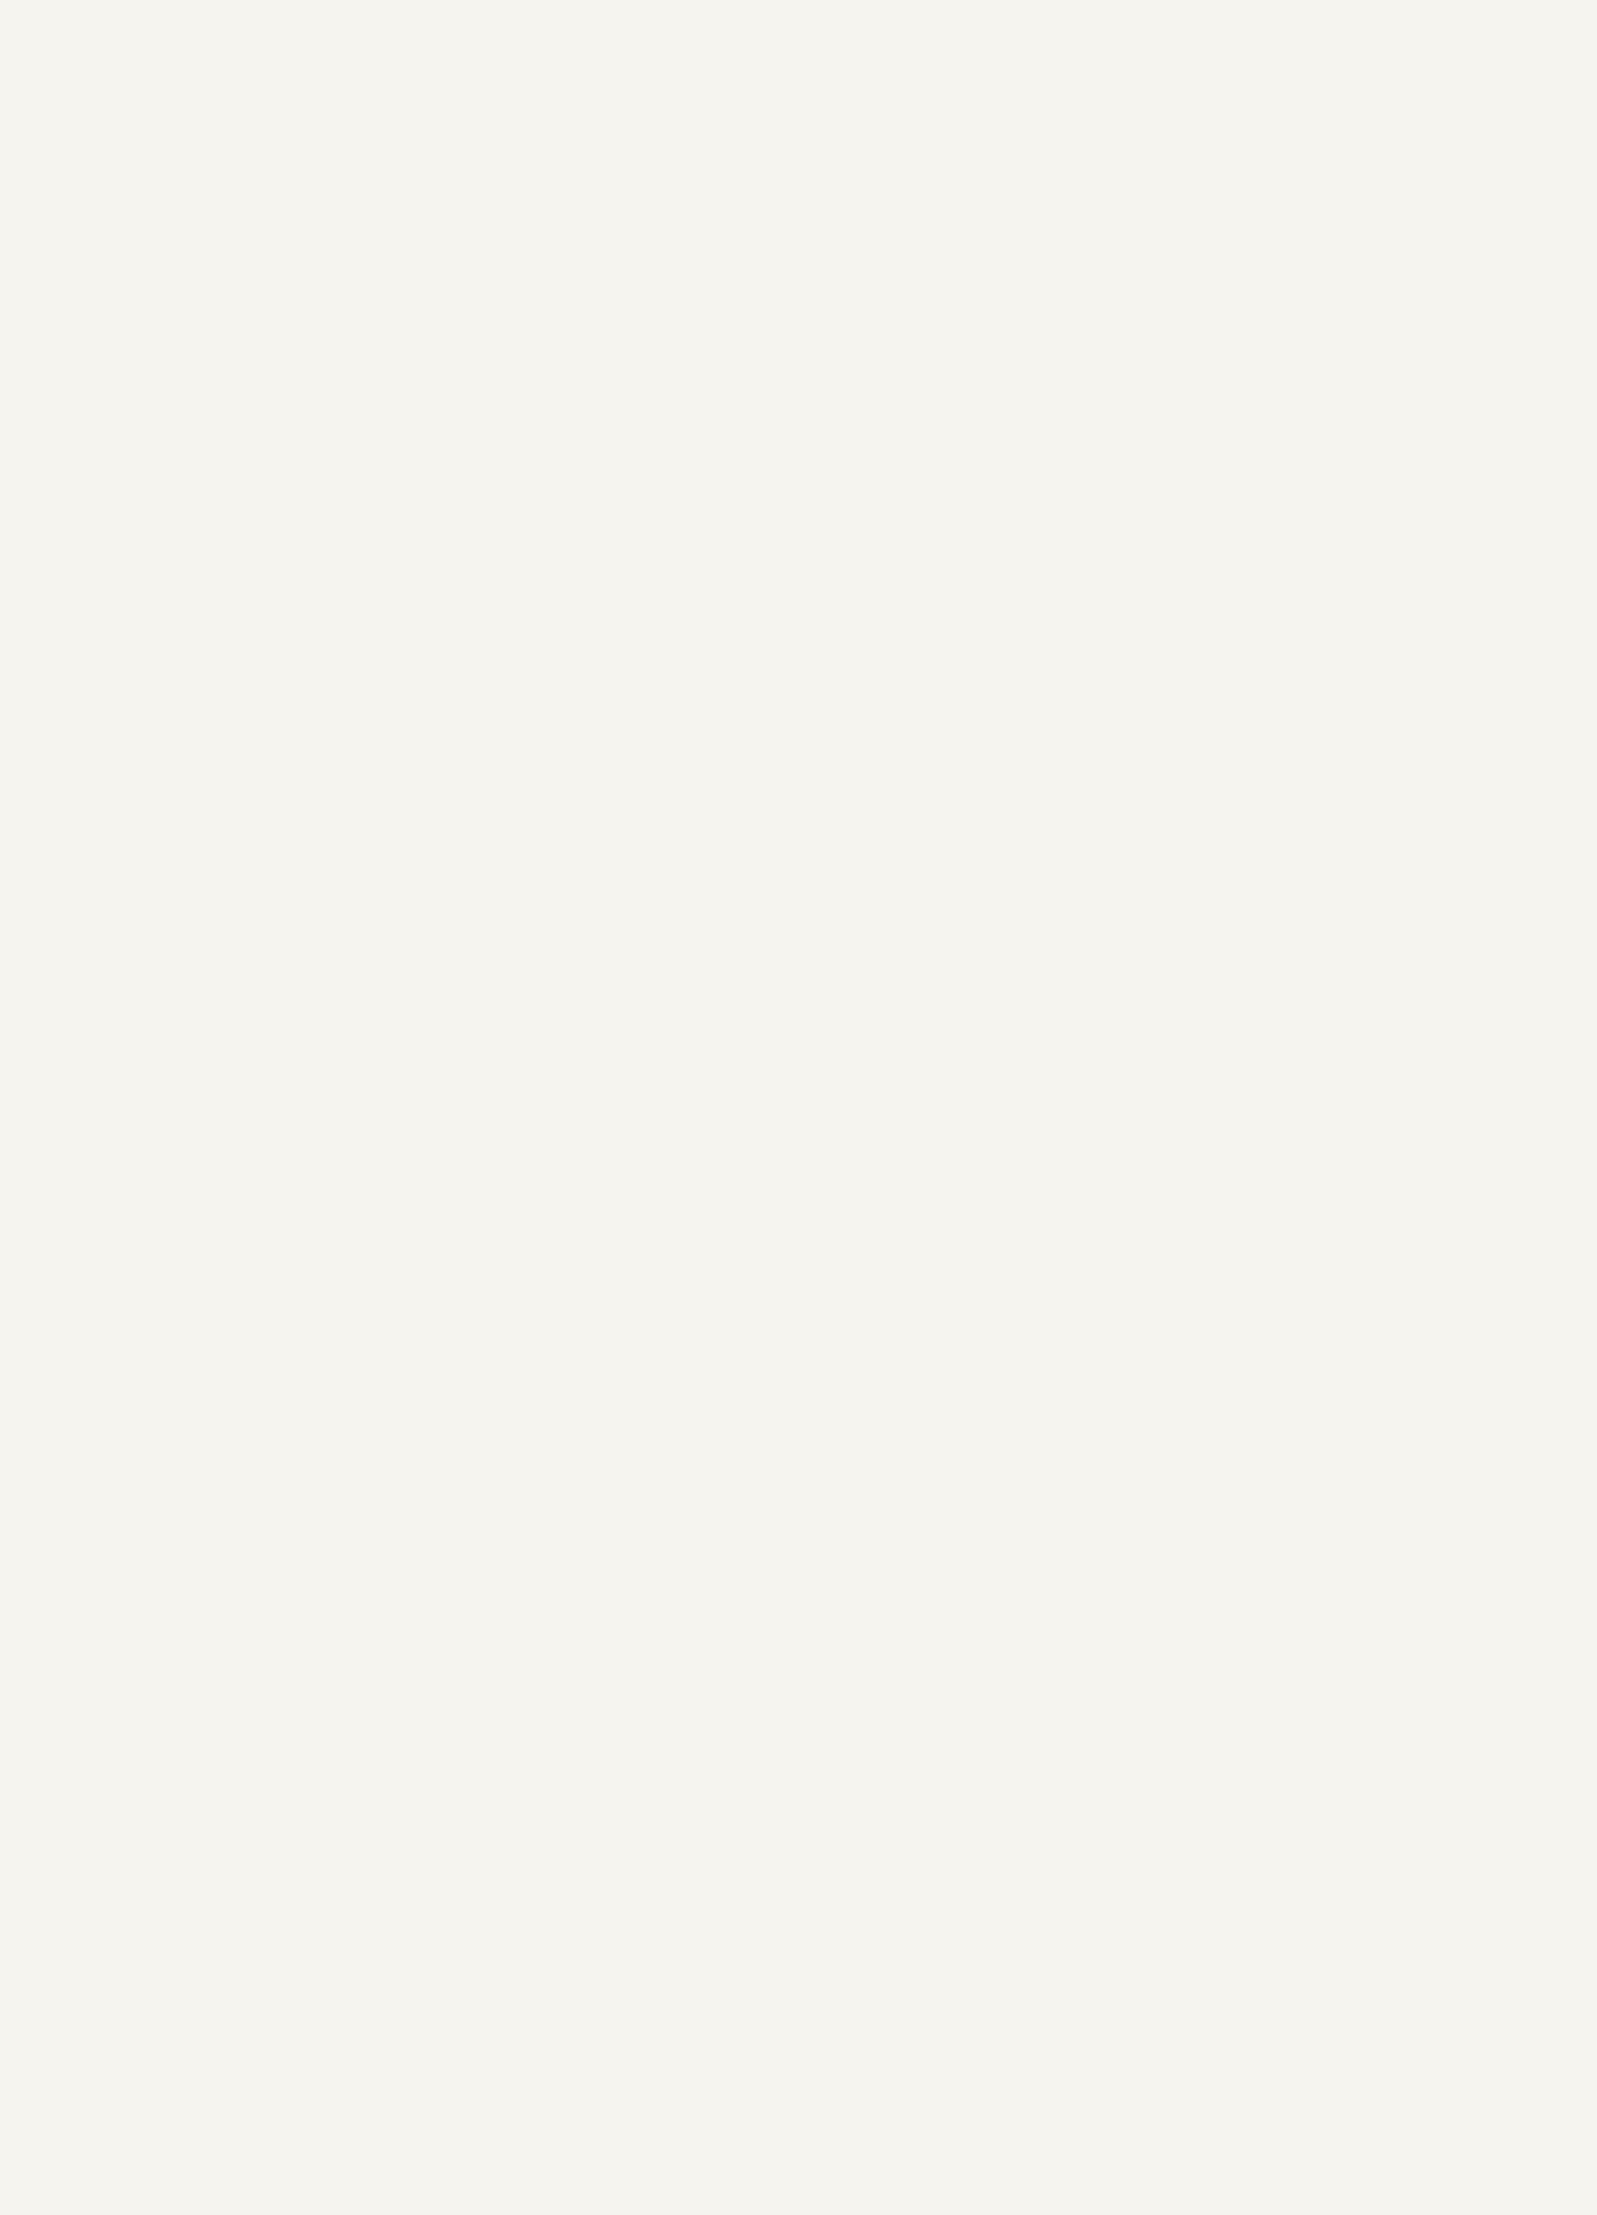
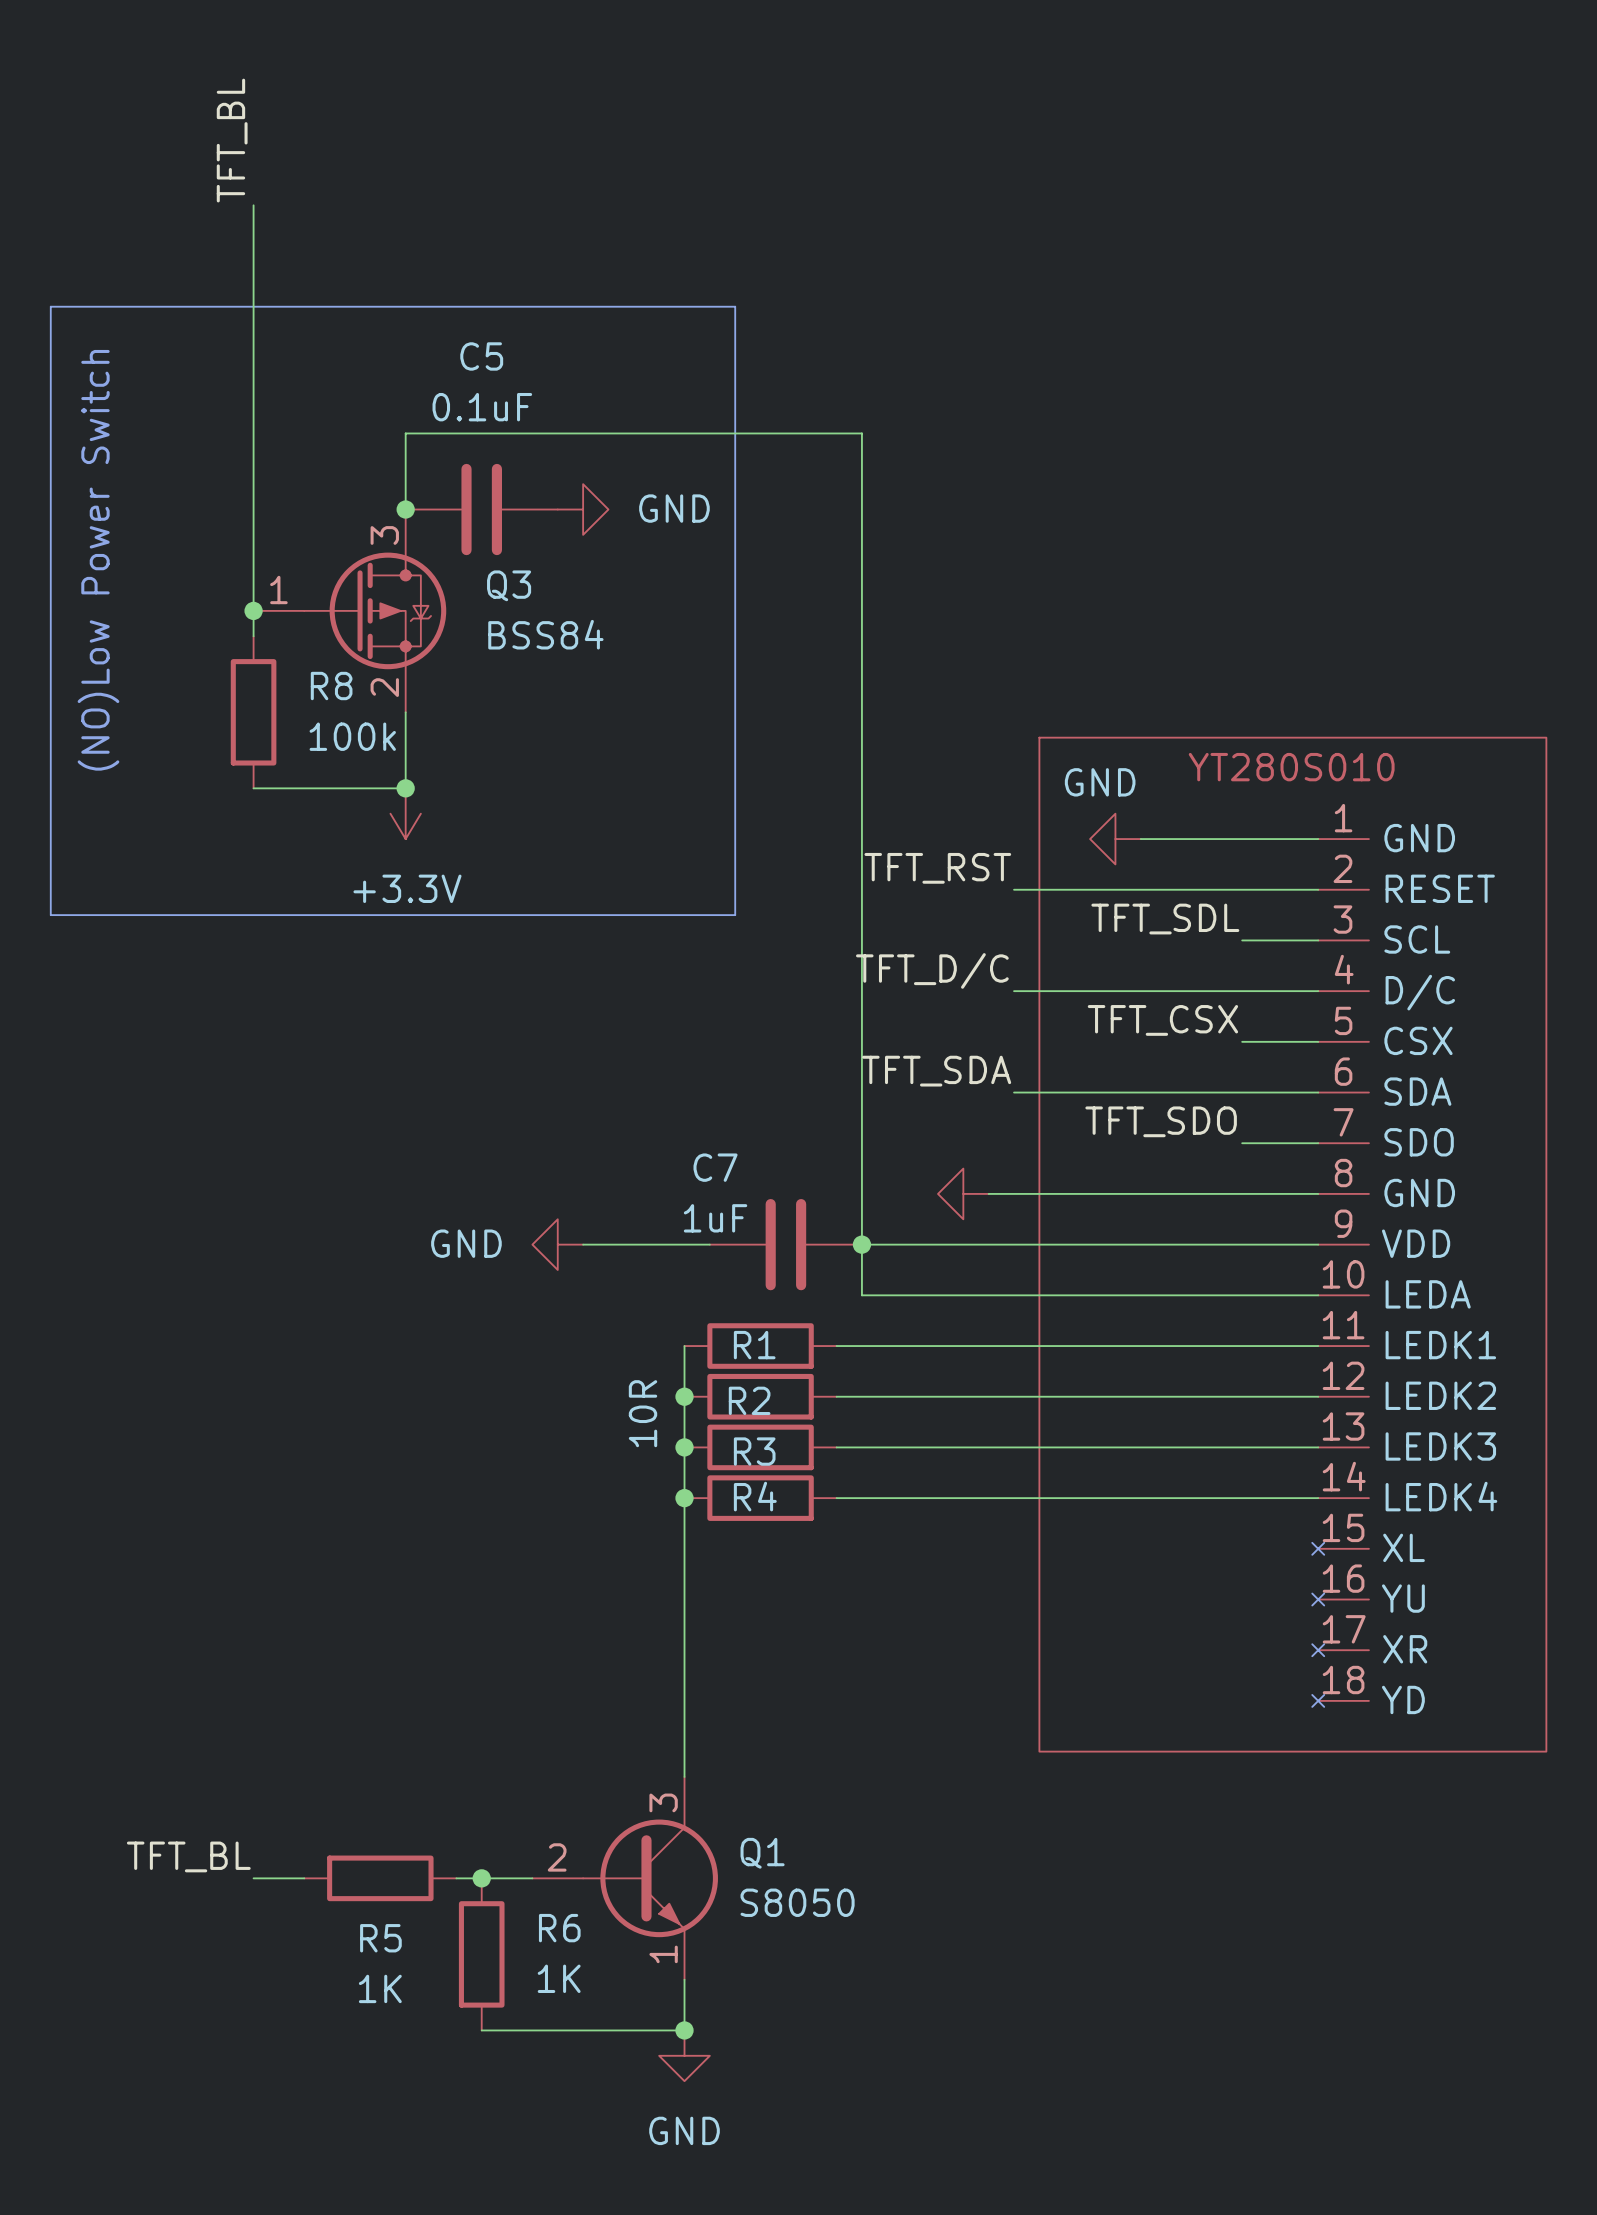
label: none -> TFT_BL (232, 140)
wire: none -> (253, 205) (253, 636)
line: none -> (50, 306) (735, 306) (735, 915) (50, 915) (50, 306)
wire: none -> (405, 509) (405, 433) (861, 433) (861, 1295) (1318, 1295)
junction: none -> (405, 509)
C5: none -> 0.1uF (481, 509)
power symbol: none -> GND (583, 509)
text: none -> (NO)Low Power Switch (98, 560)
junction: none -> (253, 610)
Q3: none -> BSS84 (349, 610)
R8: none -> 100k (253, 712)
wire: none -> (405, 712) (405, 788) (253, 788)
junction: none -> (405, 788)
power symbol: none -> +3.3V (405, 813)
power symbol: none -> GND (1115, 839)
wire: none -> (1140, 839) (1318, 839)
label: none -> TFT_RST (937, 868)
wire: none -> (1014, 889) (1318, 889)
label: none -> TFT_SDL (1165, 919)
wire: none -> (1242, 940) (1318, 940)
label: none -> TFT_D/C (932, 970)
wire: none -> (1014, 991) (1318, 991)
label: none -> TFT_CSX (1162, 1020)
wire: none -> (1242, 1041) (1318, 1041)
label: none -> TFT_SDA (936, 1071)
wire: none -> (1014, 1092) (1318, 1092)
label: none -> TFT_SDO (1161, 1121)
wire: none -> (1242, 1143) (1318, 1143)
power symbol: none -> (963, 1193)
wire: none -> (988, 1193) (1318, 1193)
power symbol: none -> GND (557, 1244)
wire: none -> (583, 1244) (709, 1244)
C7: none -> 1uF (785, 1244)
wire: none -> (861, 1244) (1318, 1244)
junction: none -> (861, 1244)
part: none -> (1292, 1244)
wire: none -> (684, 1346) (684, 1776)
R1: none -> 10R (760, 1346)
wire: none -> (836, 1346) (1318, 1346)
junction: none -> (684, 1396)
R2: none -> (760, 1396)
wire: none -> (836, 1396) (1318, 1396)
junction: none -> (684, 1447)
R3: none -> (760, 1447)
wire: none -> (836, 1447) (1318, 1447)
junction: none -> (684, 1498)
R4: none -> (760, 1498)
wire: none -> (836, 1498) (1318, 1498)
label: none -> TFT_BL (188, 1856)
wire: none -> (253, 1878) (304, 1878)
R5: none -> 1K (380, 1878)
wire: none -> (456, 1878) (532, 1878)
junction: none -> (481, 1878)
Q1: none -> S8050 (625, 1878)
R6: none -> 1K (481, 1954)
wire: none -> (684, 1979) (684, 2030) (481, 2030)
junction: none -> (684, 2030)
power symbol: none -> GND (684, 2055)

